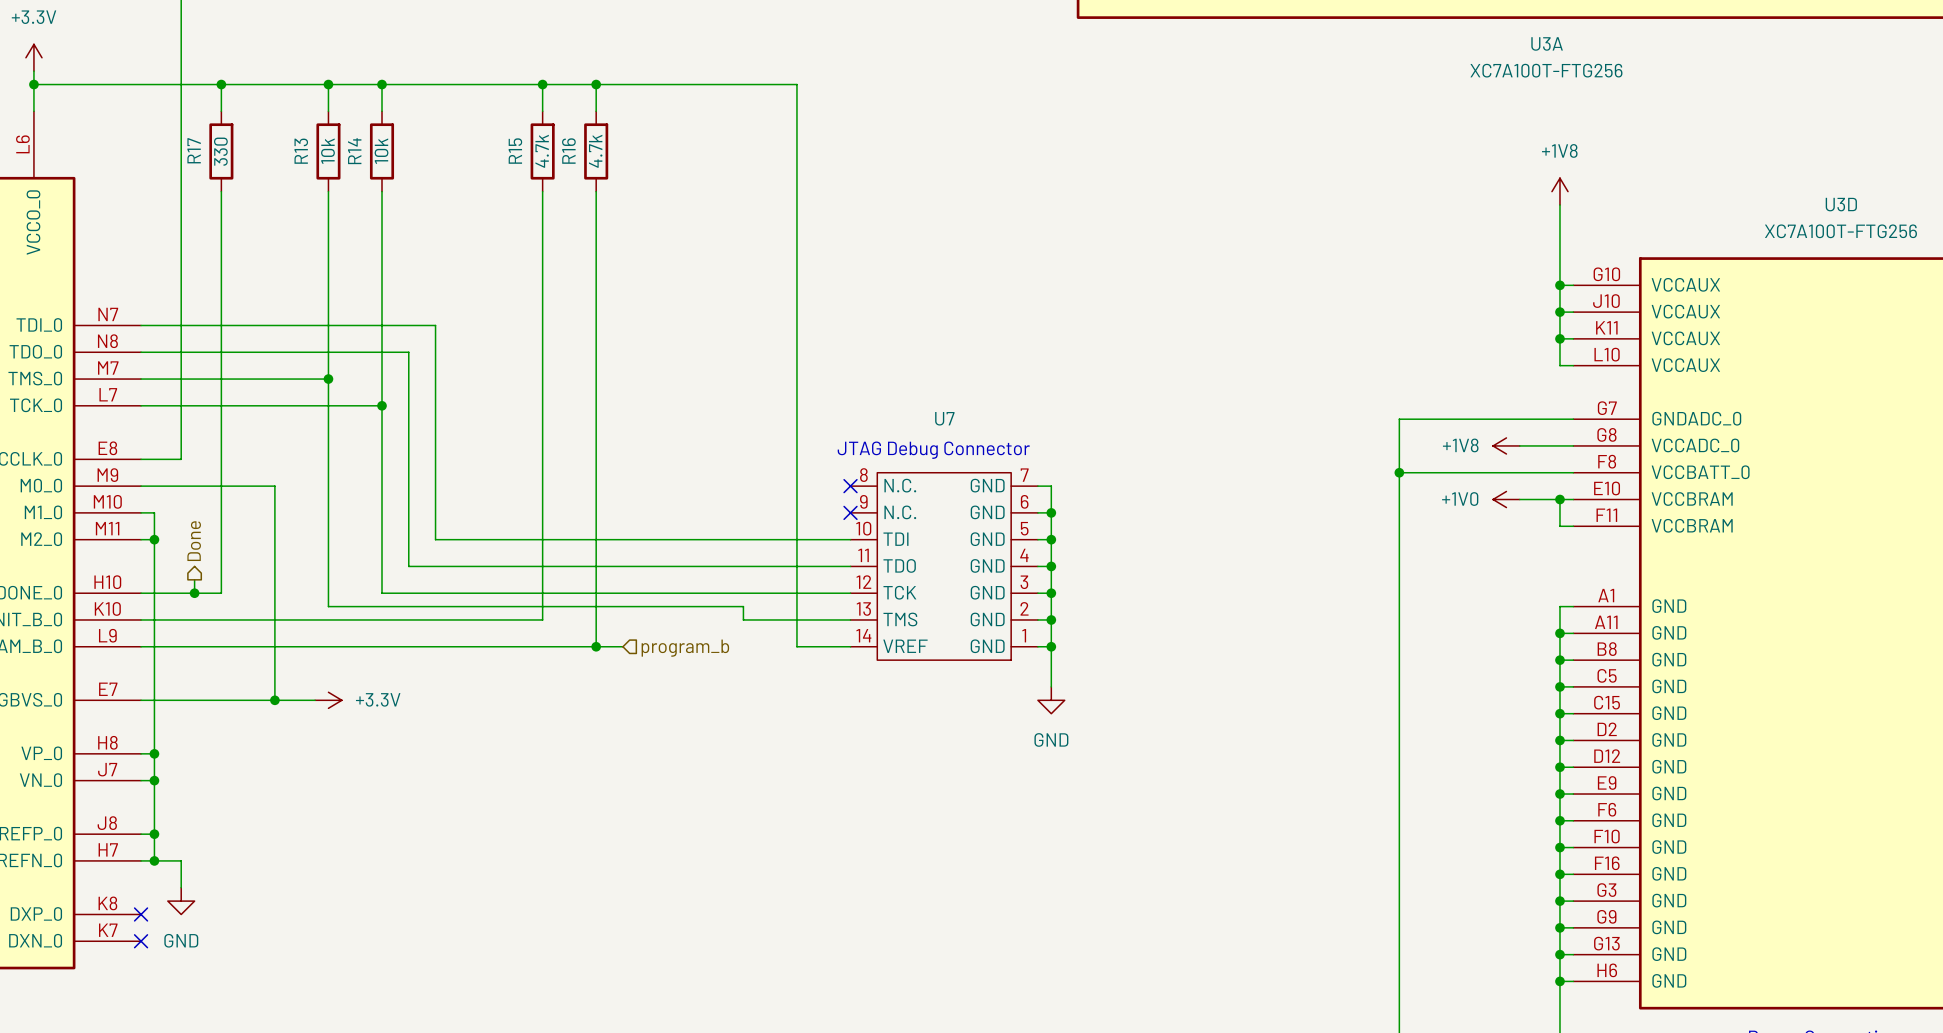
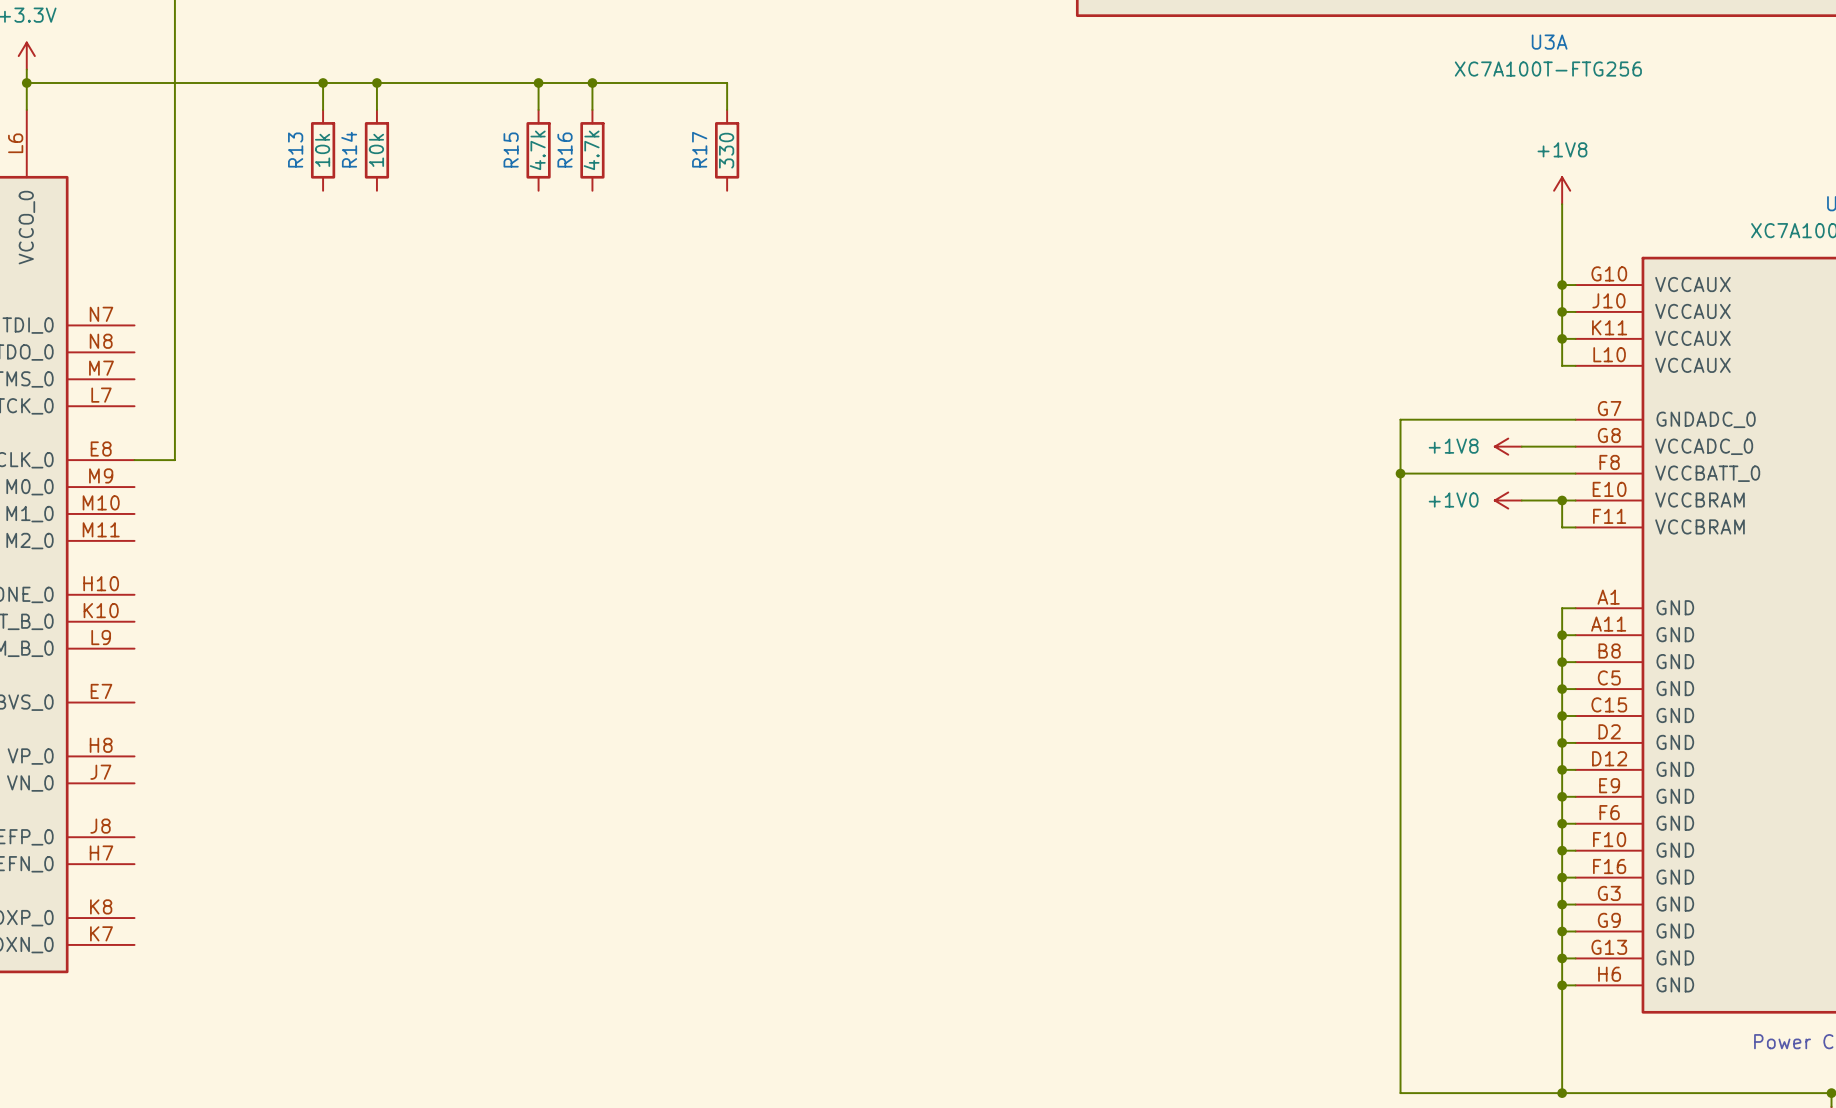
wire: (221, 84) (221, 111) -> none
junction: (221, 84) -> none
wire: (730, 84) (796, 84) (796, 646) (850, 646) -> (727, 83) (727, 109)
R17 position: (221, 151) -> (727, 150)
wire: (221, 191) (221, 593) (141, 593) -> none
wire: (328, 191) (328, 606) (743, 606) (743, 619) (850, 619) -> none
wire: (382, 191) (382, 593) (850, 593) -> none
wire: (542, 191) (542, 619) (141, 619) -> none
wire: (596, 191) (596, 646) -> none
wire: (141, 325) (435, 325) (435, 539) (850, 539) -> none
wire: (141, 352) (408, 352) (408, 566) (850, 566) -> none
wire: (141, 379) (328, 379) -> none
junction: (328, 379) -> none
wire: (141, 405) (382, 405) -> none
junction: (382, 405) -> none
text: JTAG Debug Connector (933, 450) -> none
wire: (141, 486) (274, 486) (274, 700) -> none
no-connect mark: (850, 486) -> none
wire: (1037, 486) (1051, 486) (1051, 686) -> none
wire: (141, 512) (154, 512) (154, 860) -> none
no-connect mark: (850, 512) -> none
wire: (1037, 512) (1051, 512) -> none
junction: (1051, 512) -> none
wire: (141, 539) (154, 539) -> none
junction: (154, 539) -> none
wire: (1037, 539) (1051, 539) -> none
junction: (1051, 539) -> none
hierarchical label: Done (194, 541) -> none
U7: (944, 566) -> none
wire: (1037, 566) (1051, 566) -> none
junction: (1051, 566) -> none
wire: (194, 579) (194, 593) -> none
junction: (194, 593) -> none
wire: (1037, 593) (1051, 593) -> none
junction: (1051, 593) -> none
wire: (1037, 619) (1051, 619) -> none
junction: (1051, 619) -> none
wire: (141, 646) (622, 646) -> none
junction: (596, 646) -> none
wire: (1037, 646) (1051, 646) -> none
junction: (1051, 646) -> none
hierarchical label: program_b (685, 648) -> none
wire: (141, 700) (315, 700) -> none
junction: (274, 700) -> none
power symbol: +3.3V (328, 700) -> none
power symbol: GND (1051, 700) -> none
wire: (141, 753) (154, 753) -> none
junction: (154, 753) -> none
wire: (141, 780) (154, 780) -> none
junction: (154, 780) -> none
wire: (141, 834) (154, 834) -> none
junction: (154, 834) -> none
wire: (141, 860) (181, 860) (181, 887) -> none
junction: (154, 860) -> none
power symbol: GND (181, 901) -> none
no-connect mark: (141, 914) -> none
no-connect mark: (141, 941) -> none

